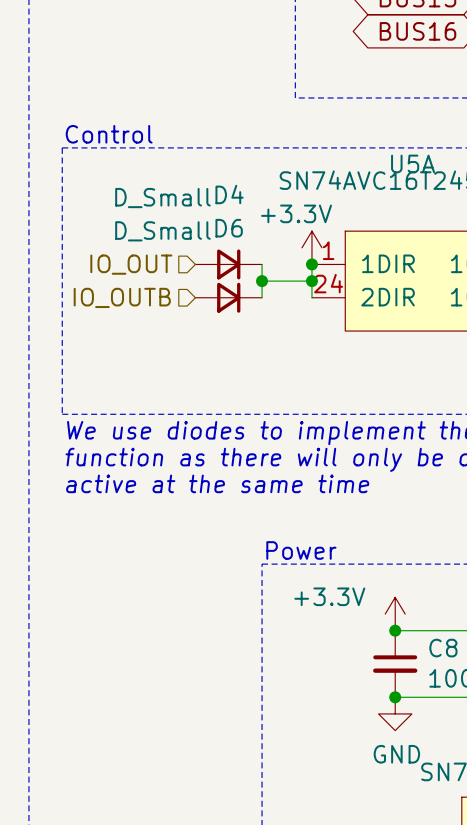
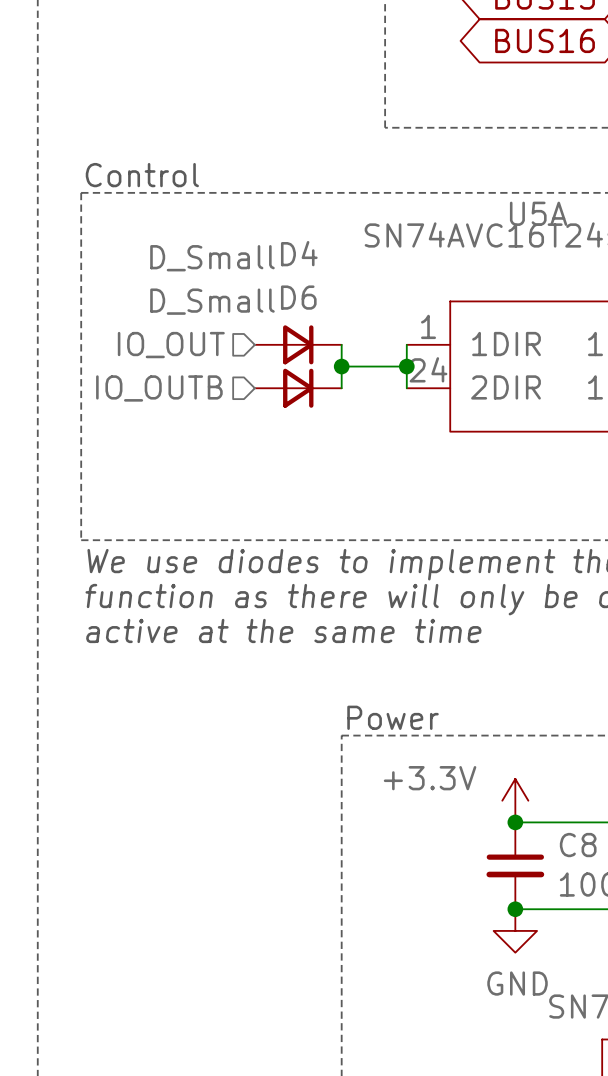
power symbol: +3.3V (311, 247) -> none
junction: (311, 264) -> none

